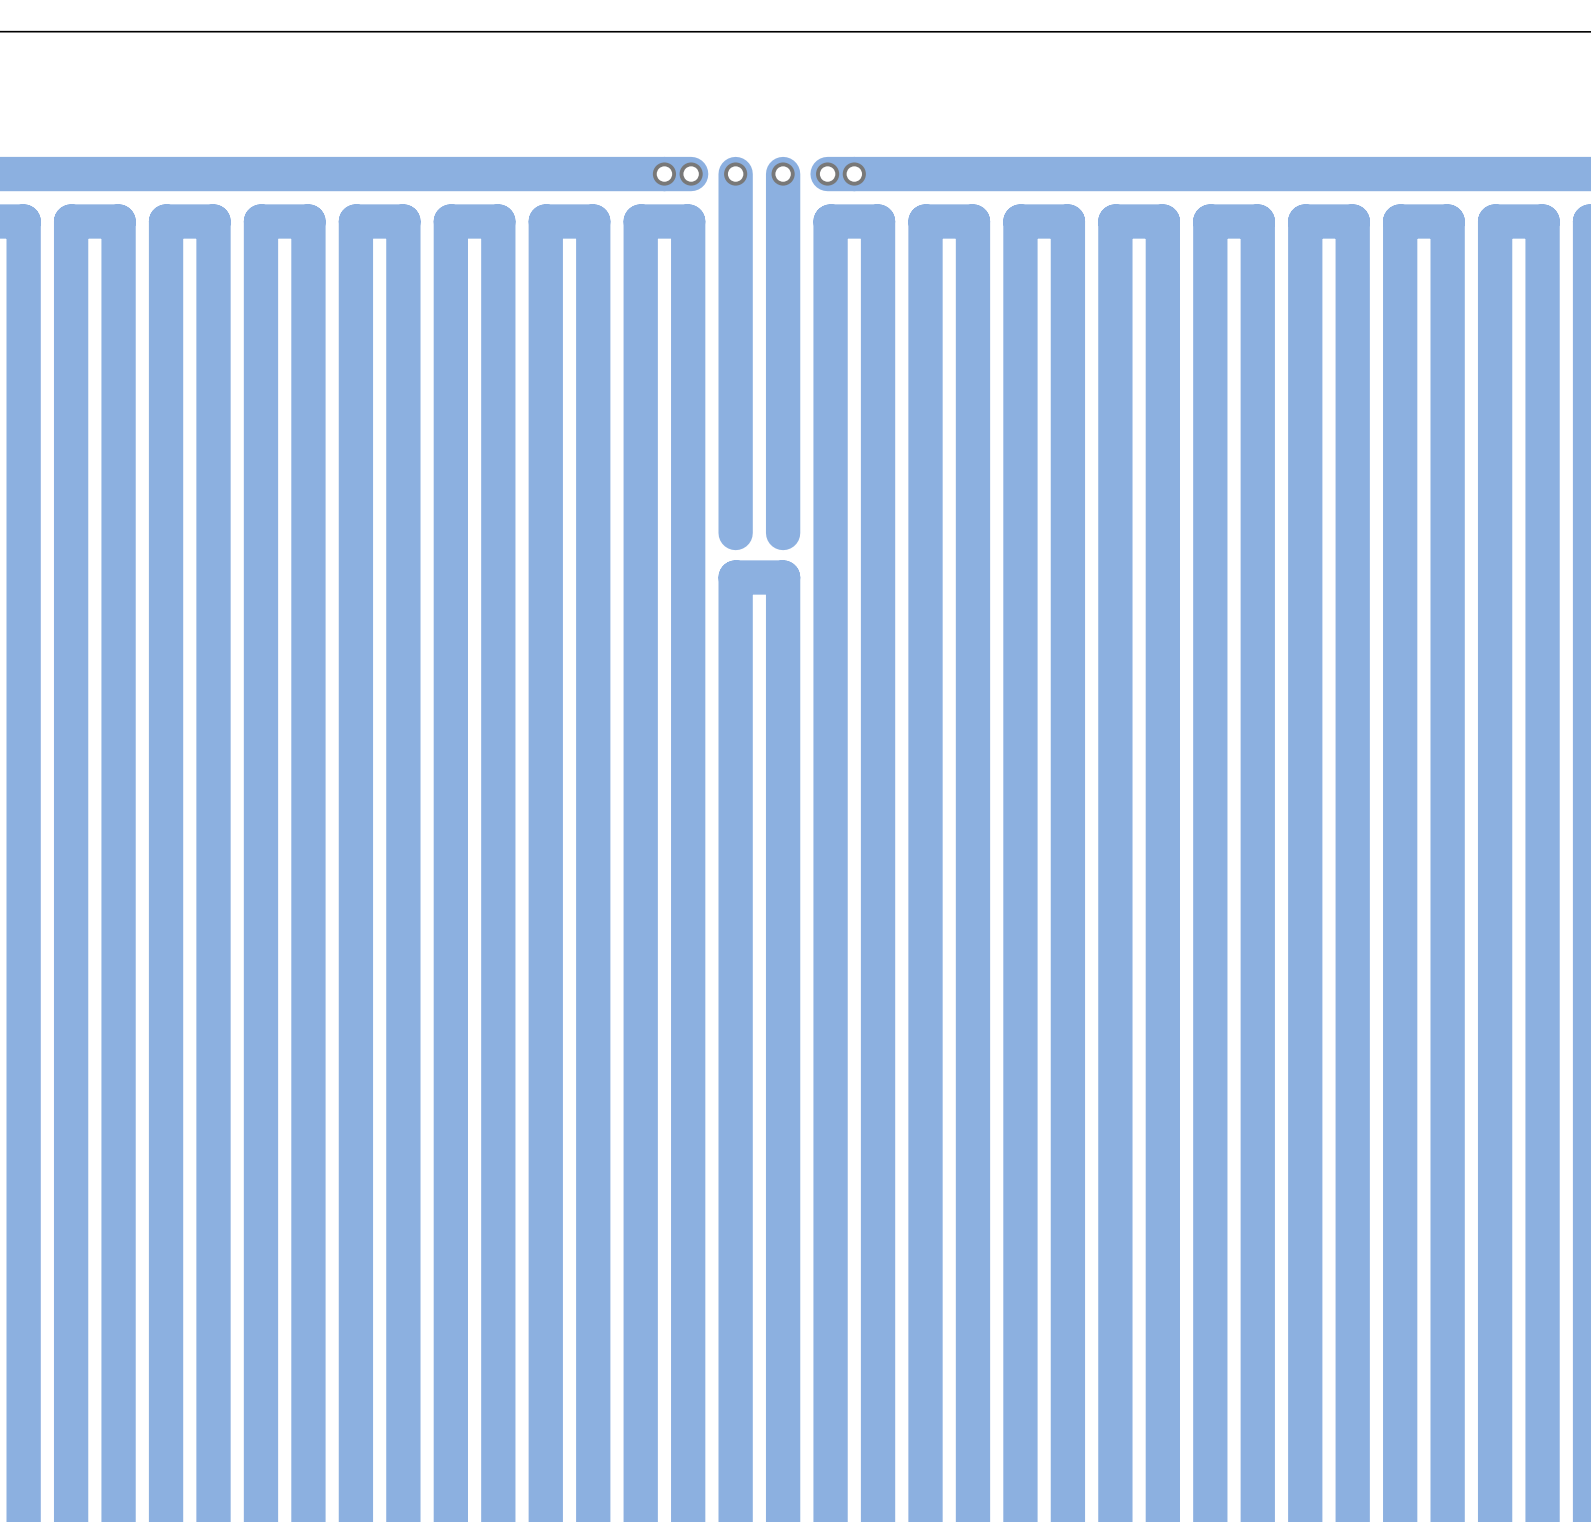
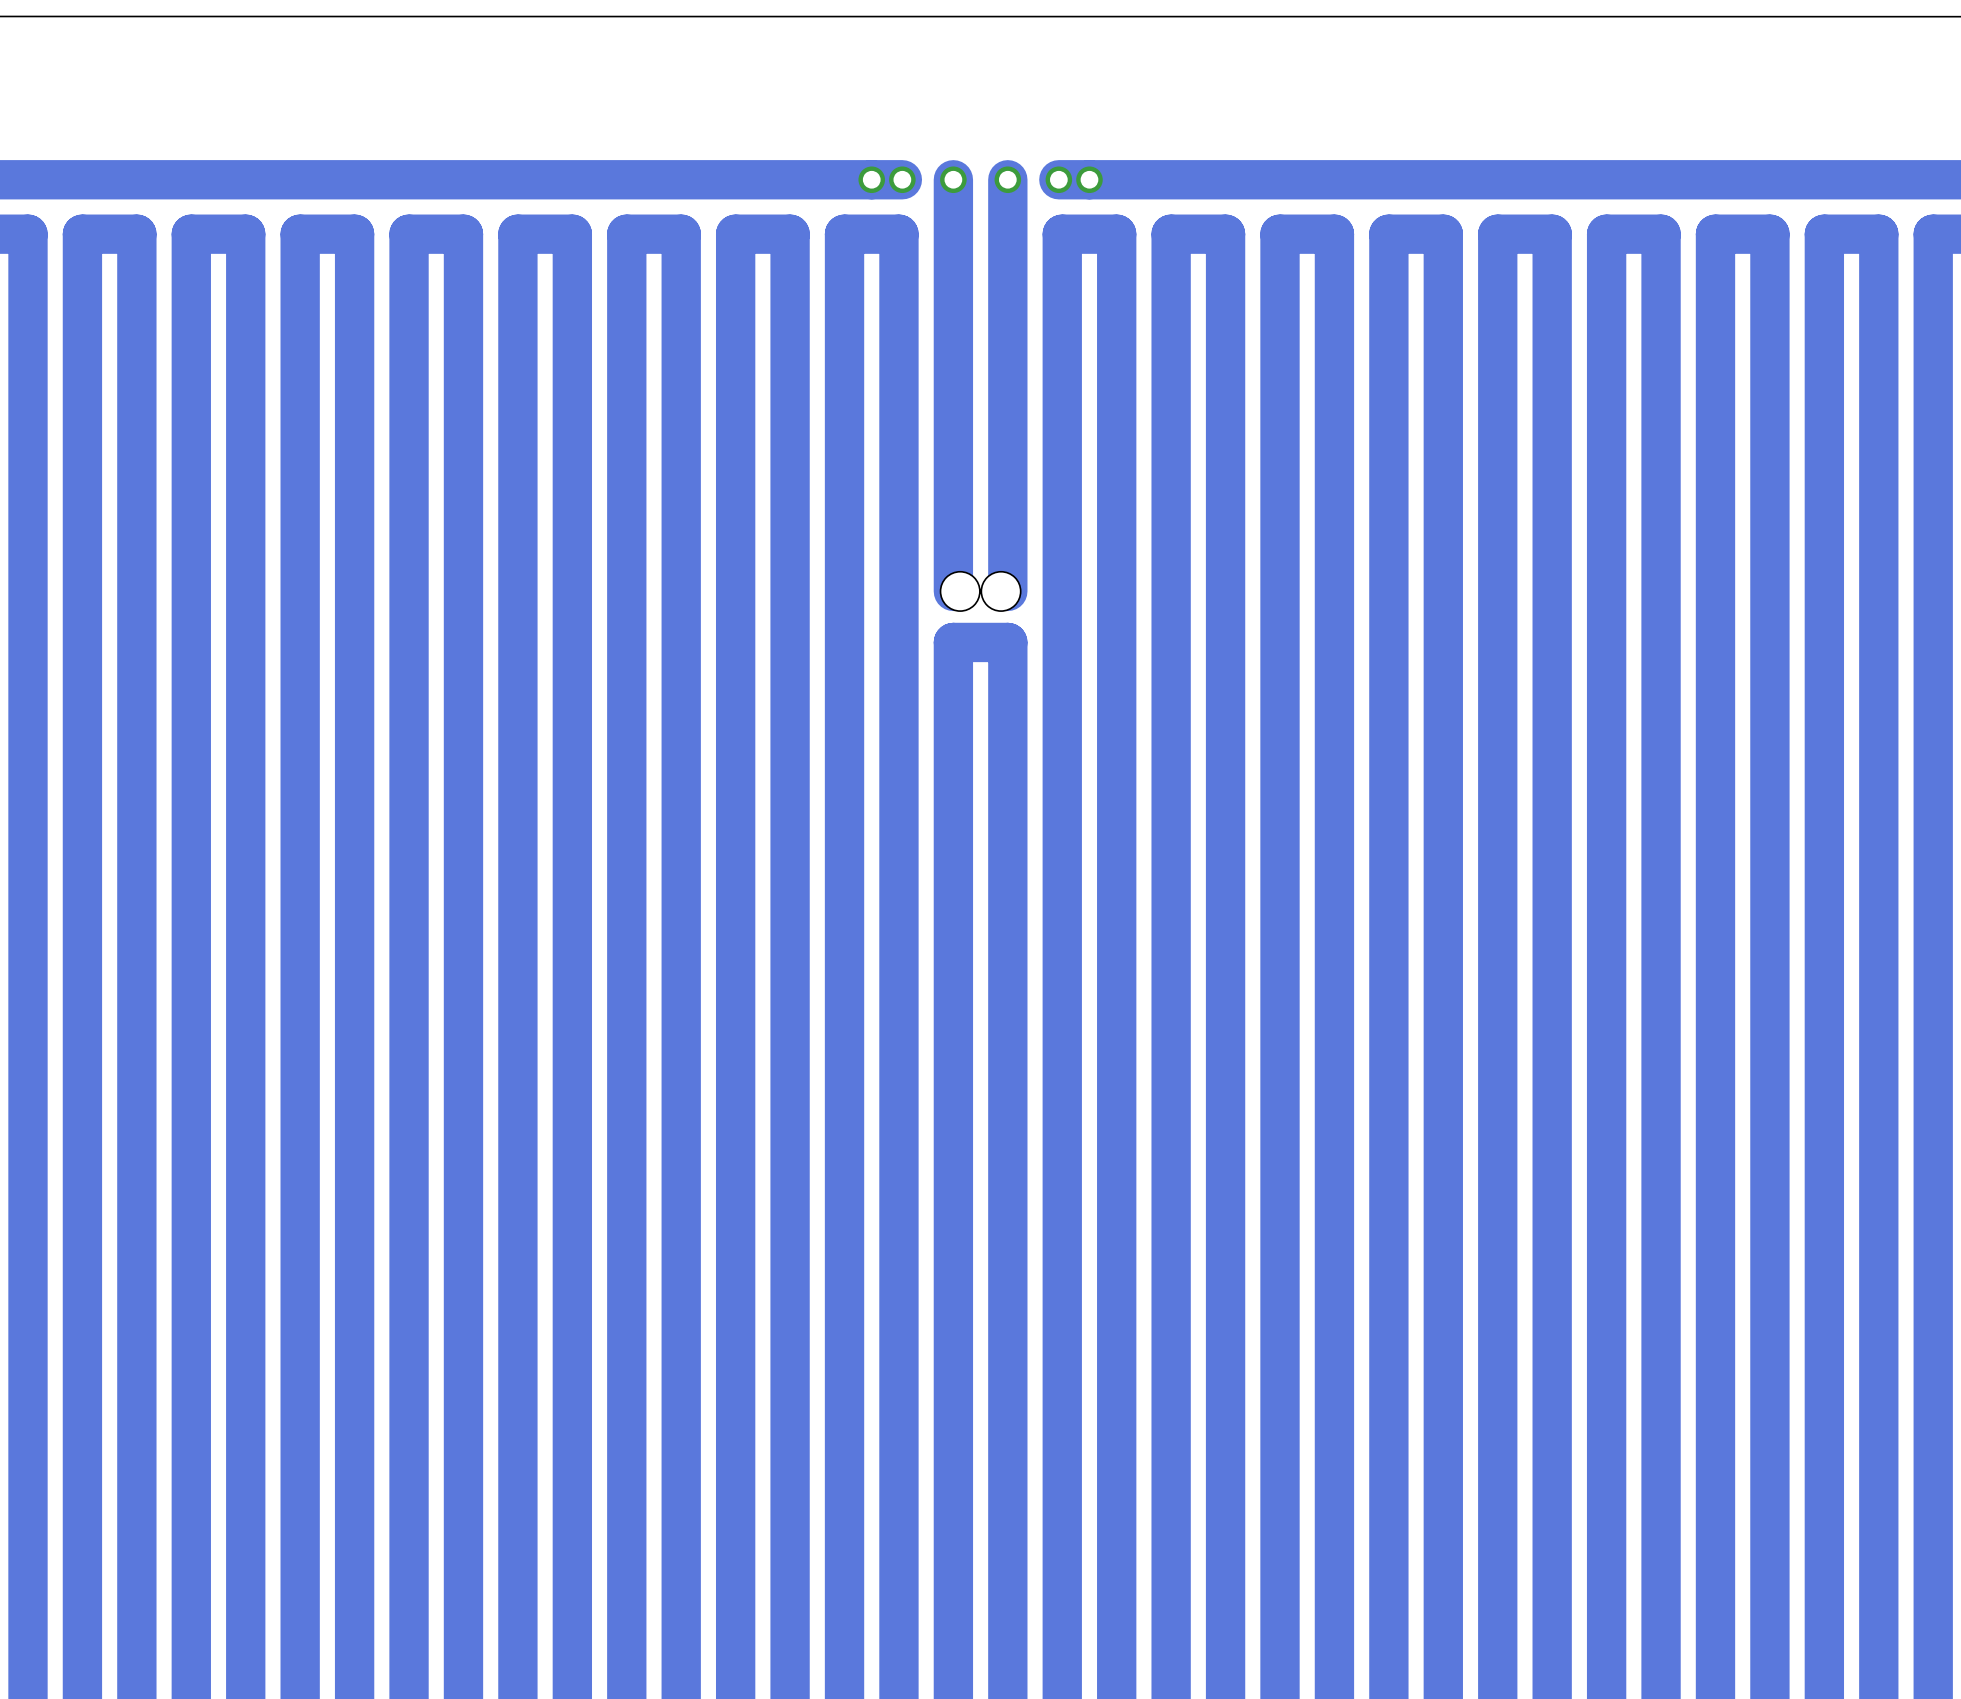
hole: none -> (960, 591)
hole: none -> (1001, 591)

